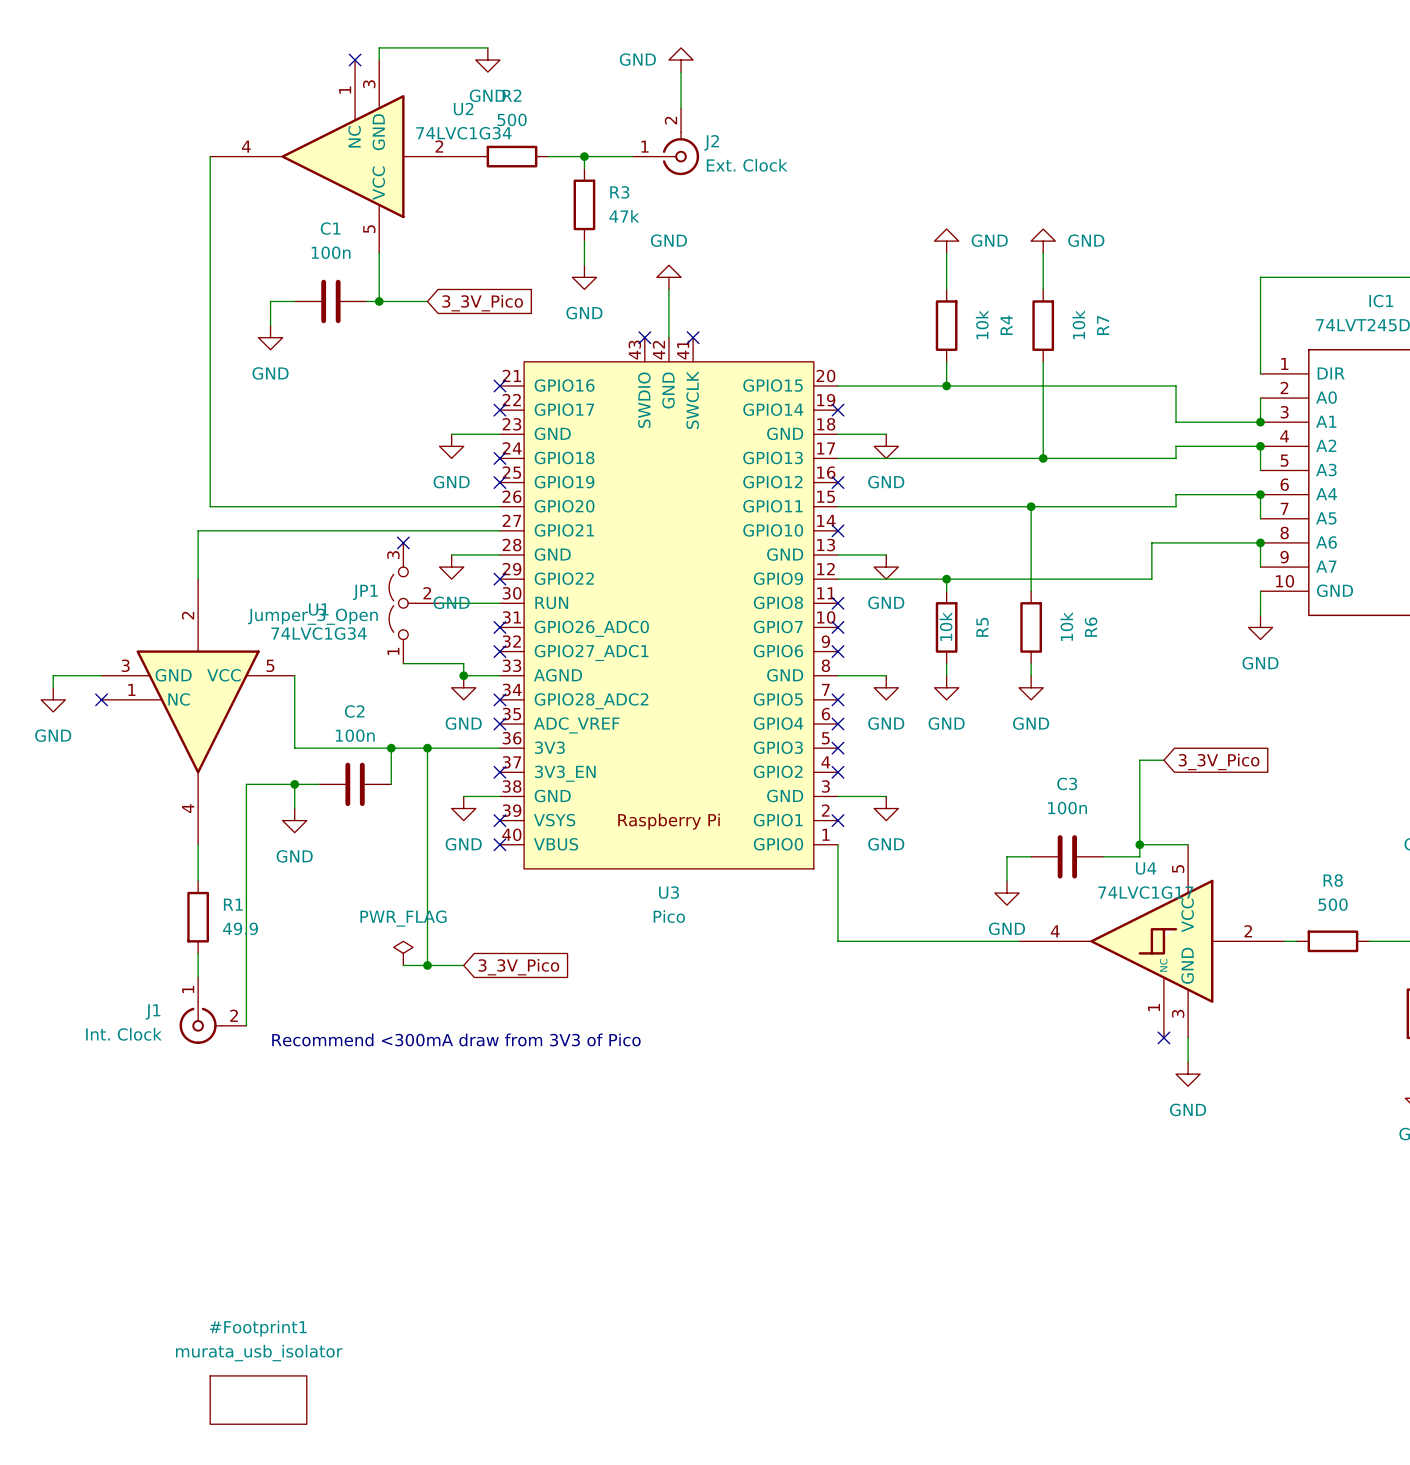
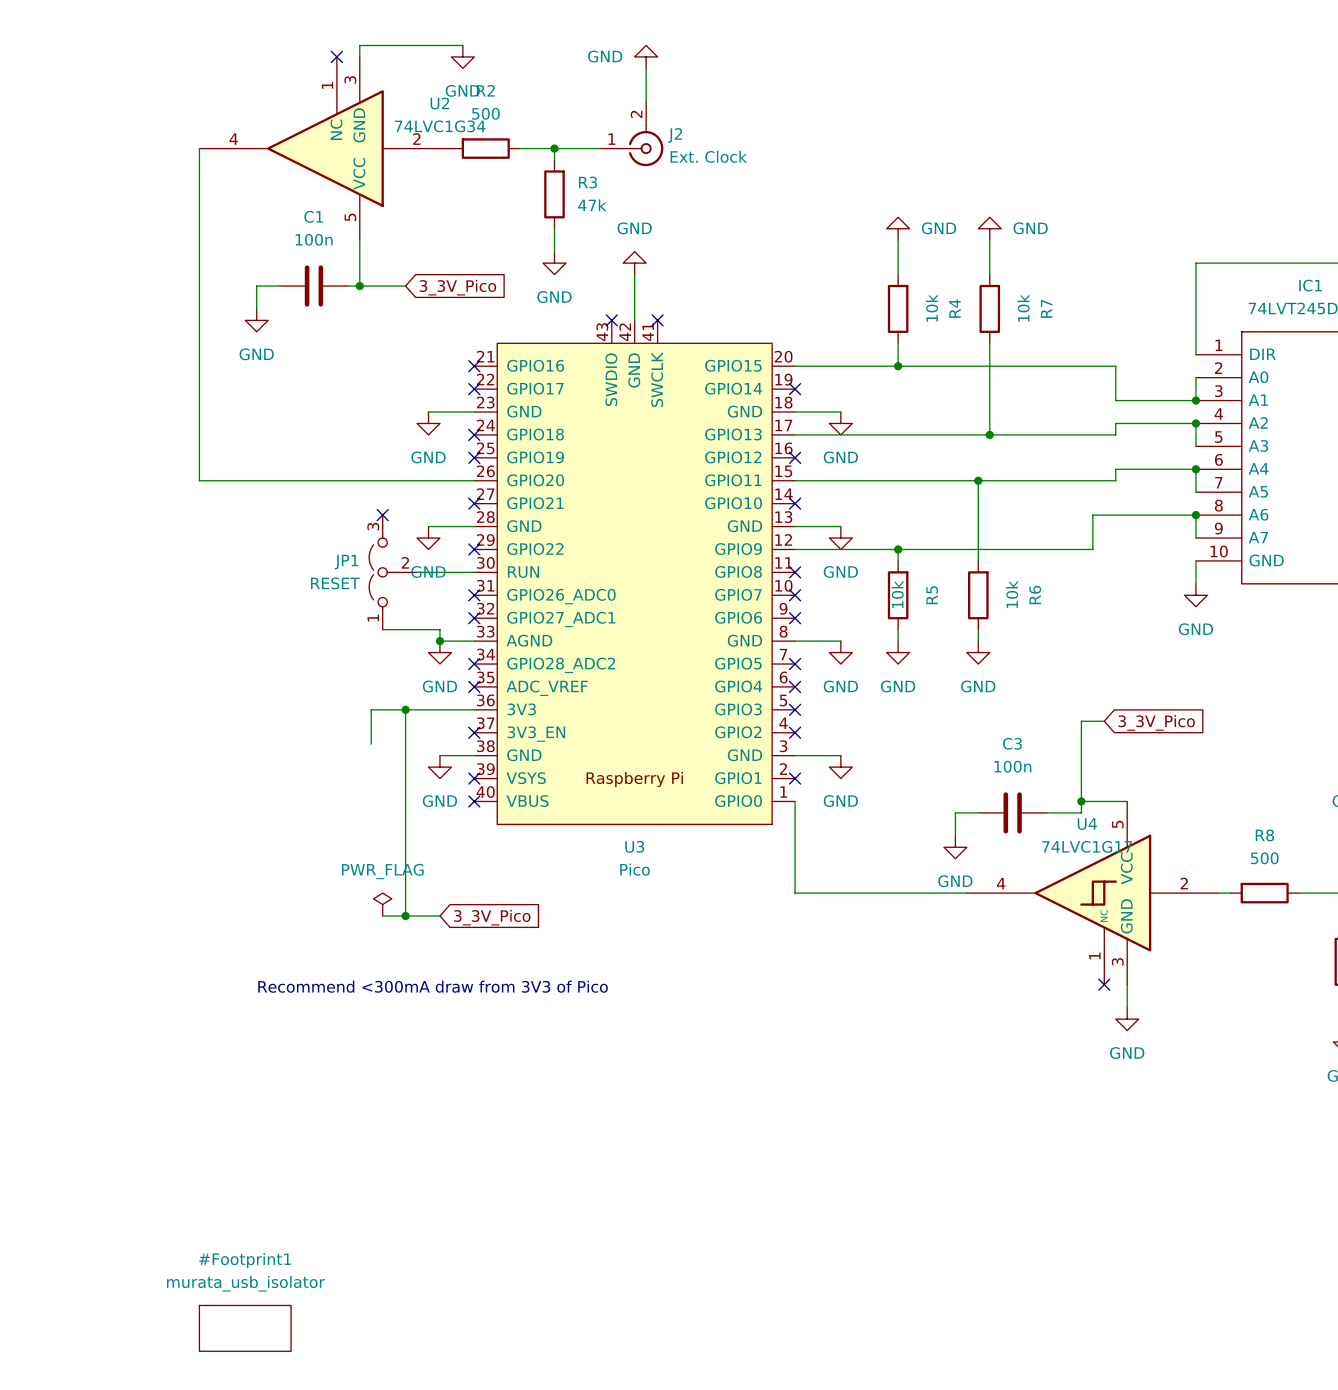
wire: (499, 530) (198, 530) (198, 579) -> none
no-connect mark: none -> (474, 503)
JP1 value: Jumper_3_Open (312, 616) -> RESET (335, 583)
wire: (101, 675) (53, 675) (53, 687) -> none
wire: (294, 675) (294, 748) (391, 748) -> none
power symbol: GND (53, 699) -> none
no-connect mark: (101, 699) -> none
U1: 74LVC1G34 (198, 711) -> none
junction: (391, 748) -> none
wire: (294, 784) (294, 808) -> none
junction: (294, 784) -> none
wire: (318, 784) (246, 784) (246, 1025) -> none
C2: 100n (355, 784) -> none
power symbol: GND (294, 820) -> none
wire: (198, 844) (198, 880) -> none
R1: 49.9 (198, 917) -> none
wire: (198, 953) (198, 977) -> none
J1: Int. Clock (212, 1010) -> none

